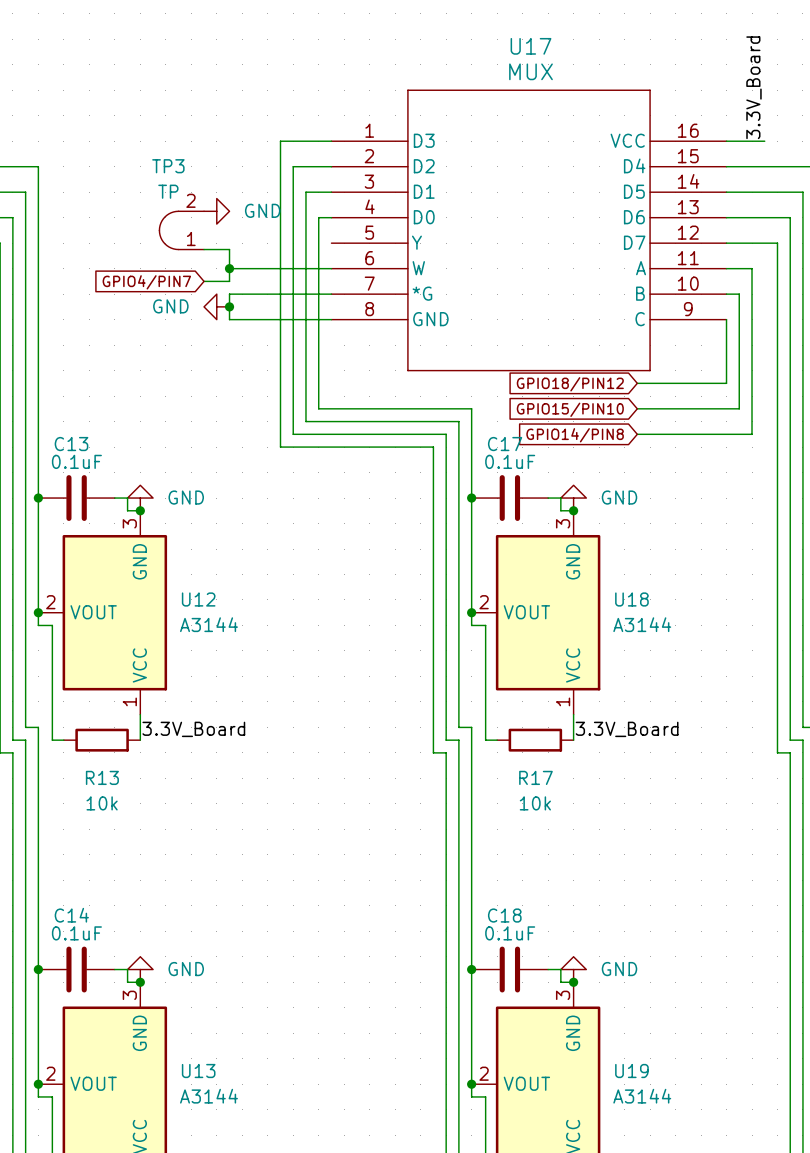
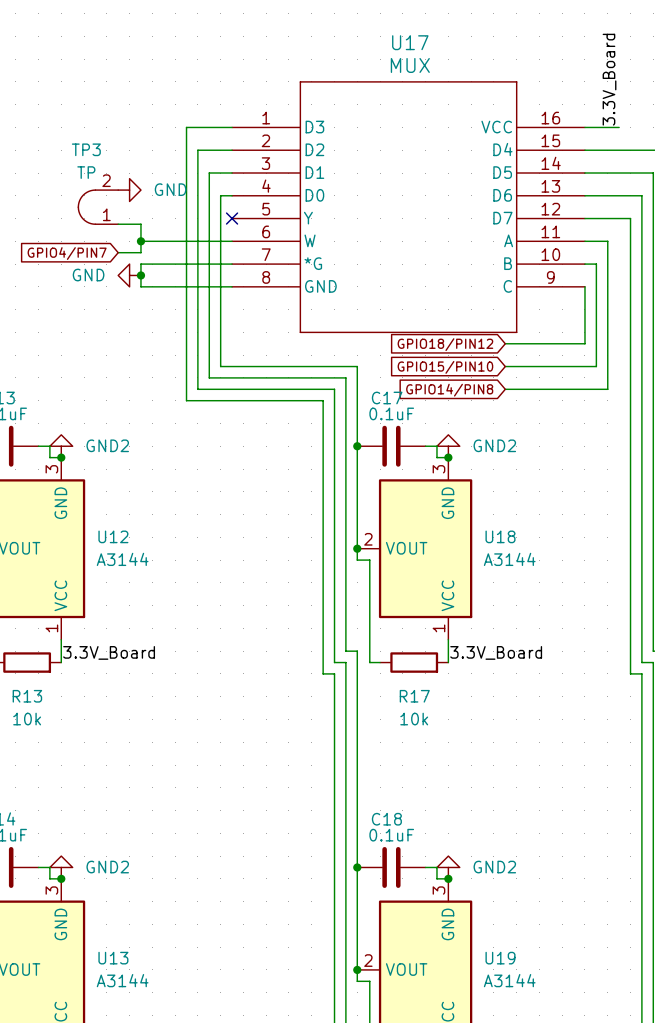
no-connect mark: none -> (232, 218)
power symbol: GND (140, 498) -> GND2 (61, 446)
power symbol: GND (573, 498) -> GND2 (448, 446)
power symbol: GND (140, 969) -> GND2 (61, 867)
power symbol: GND (573, 969) -> GND2 (448, 867)

